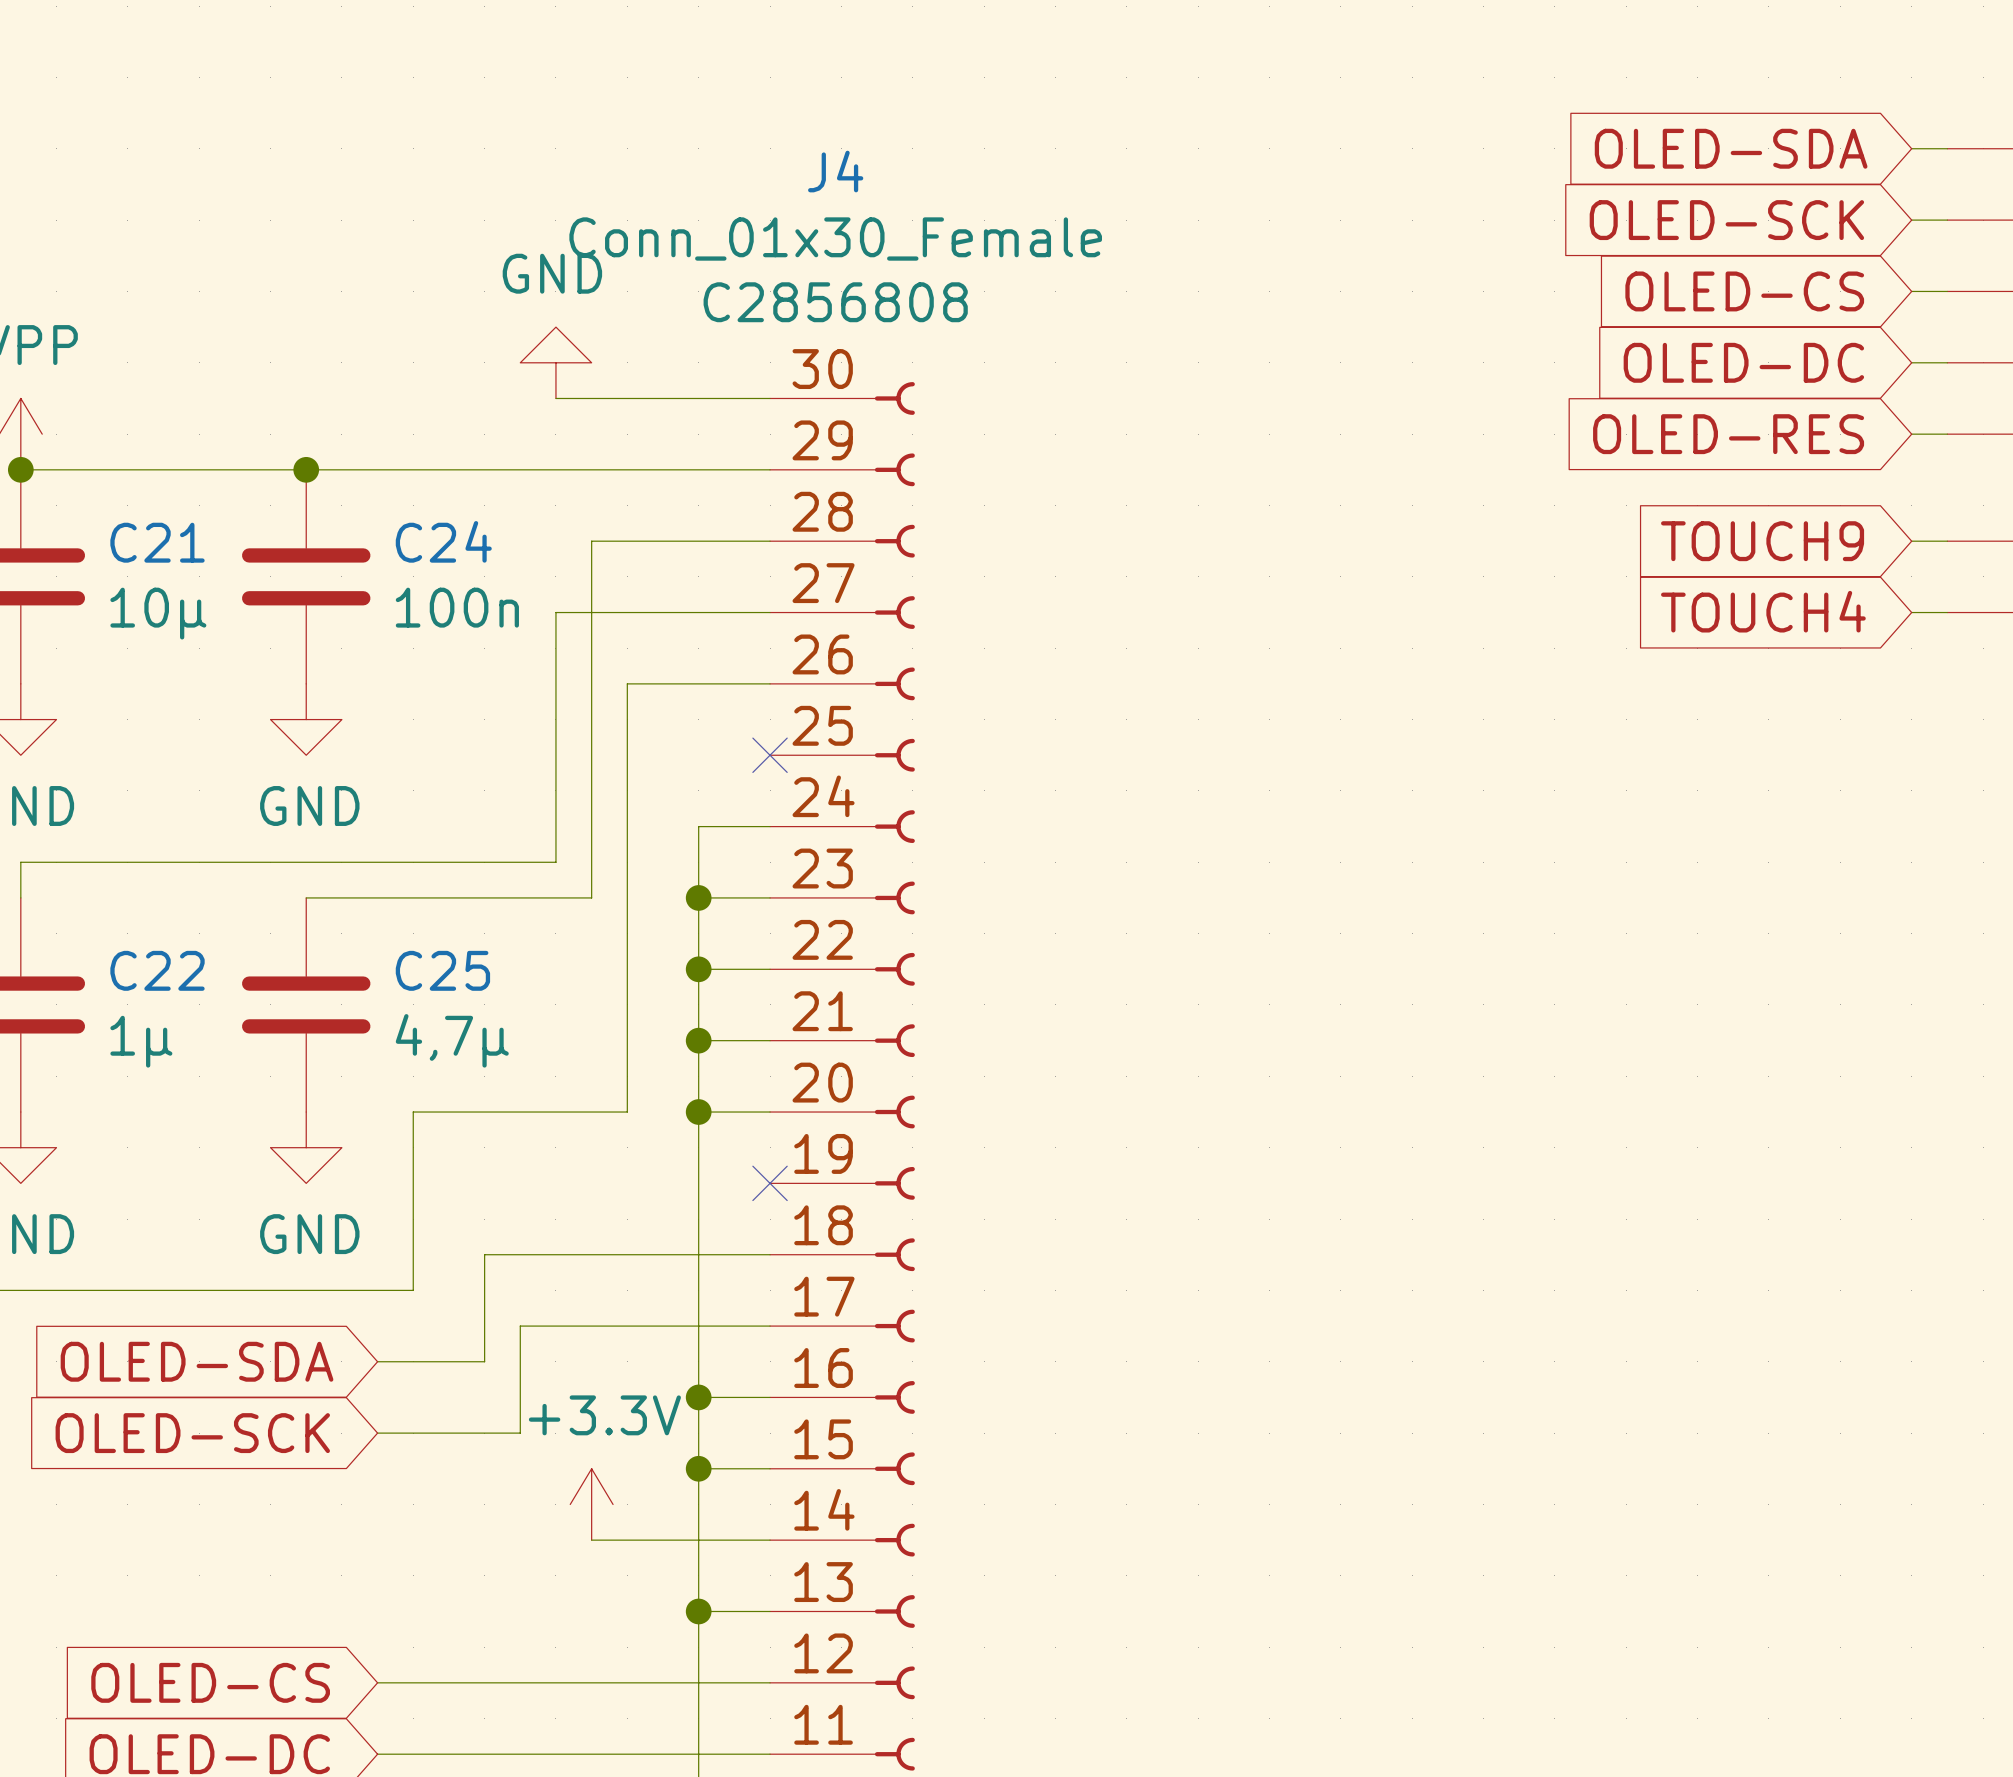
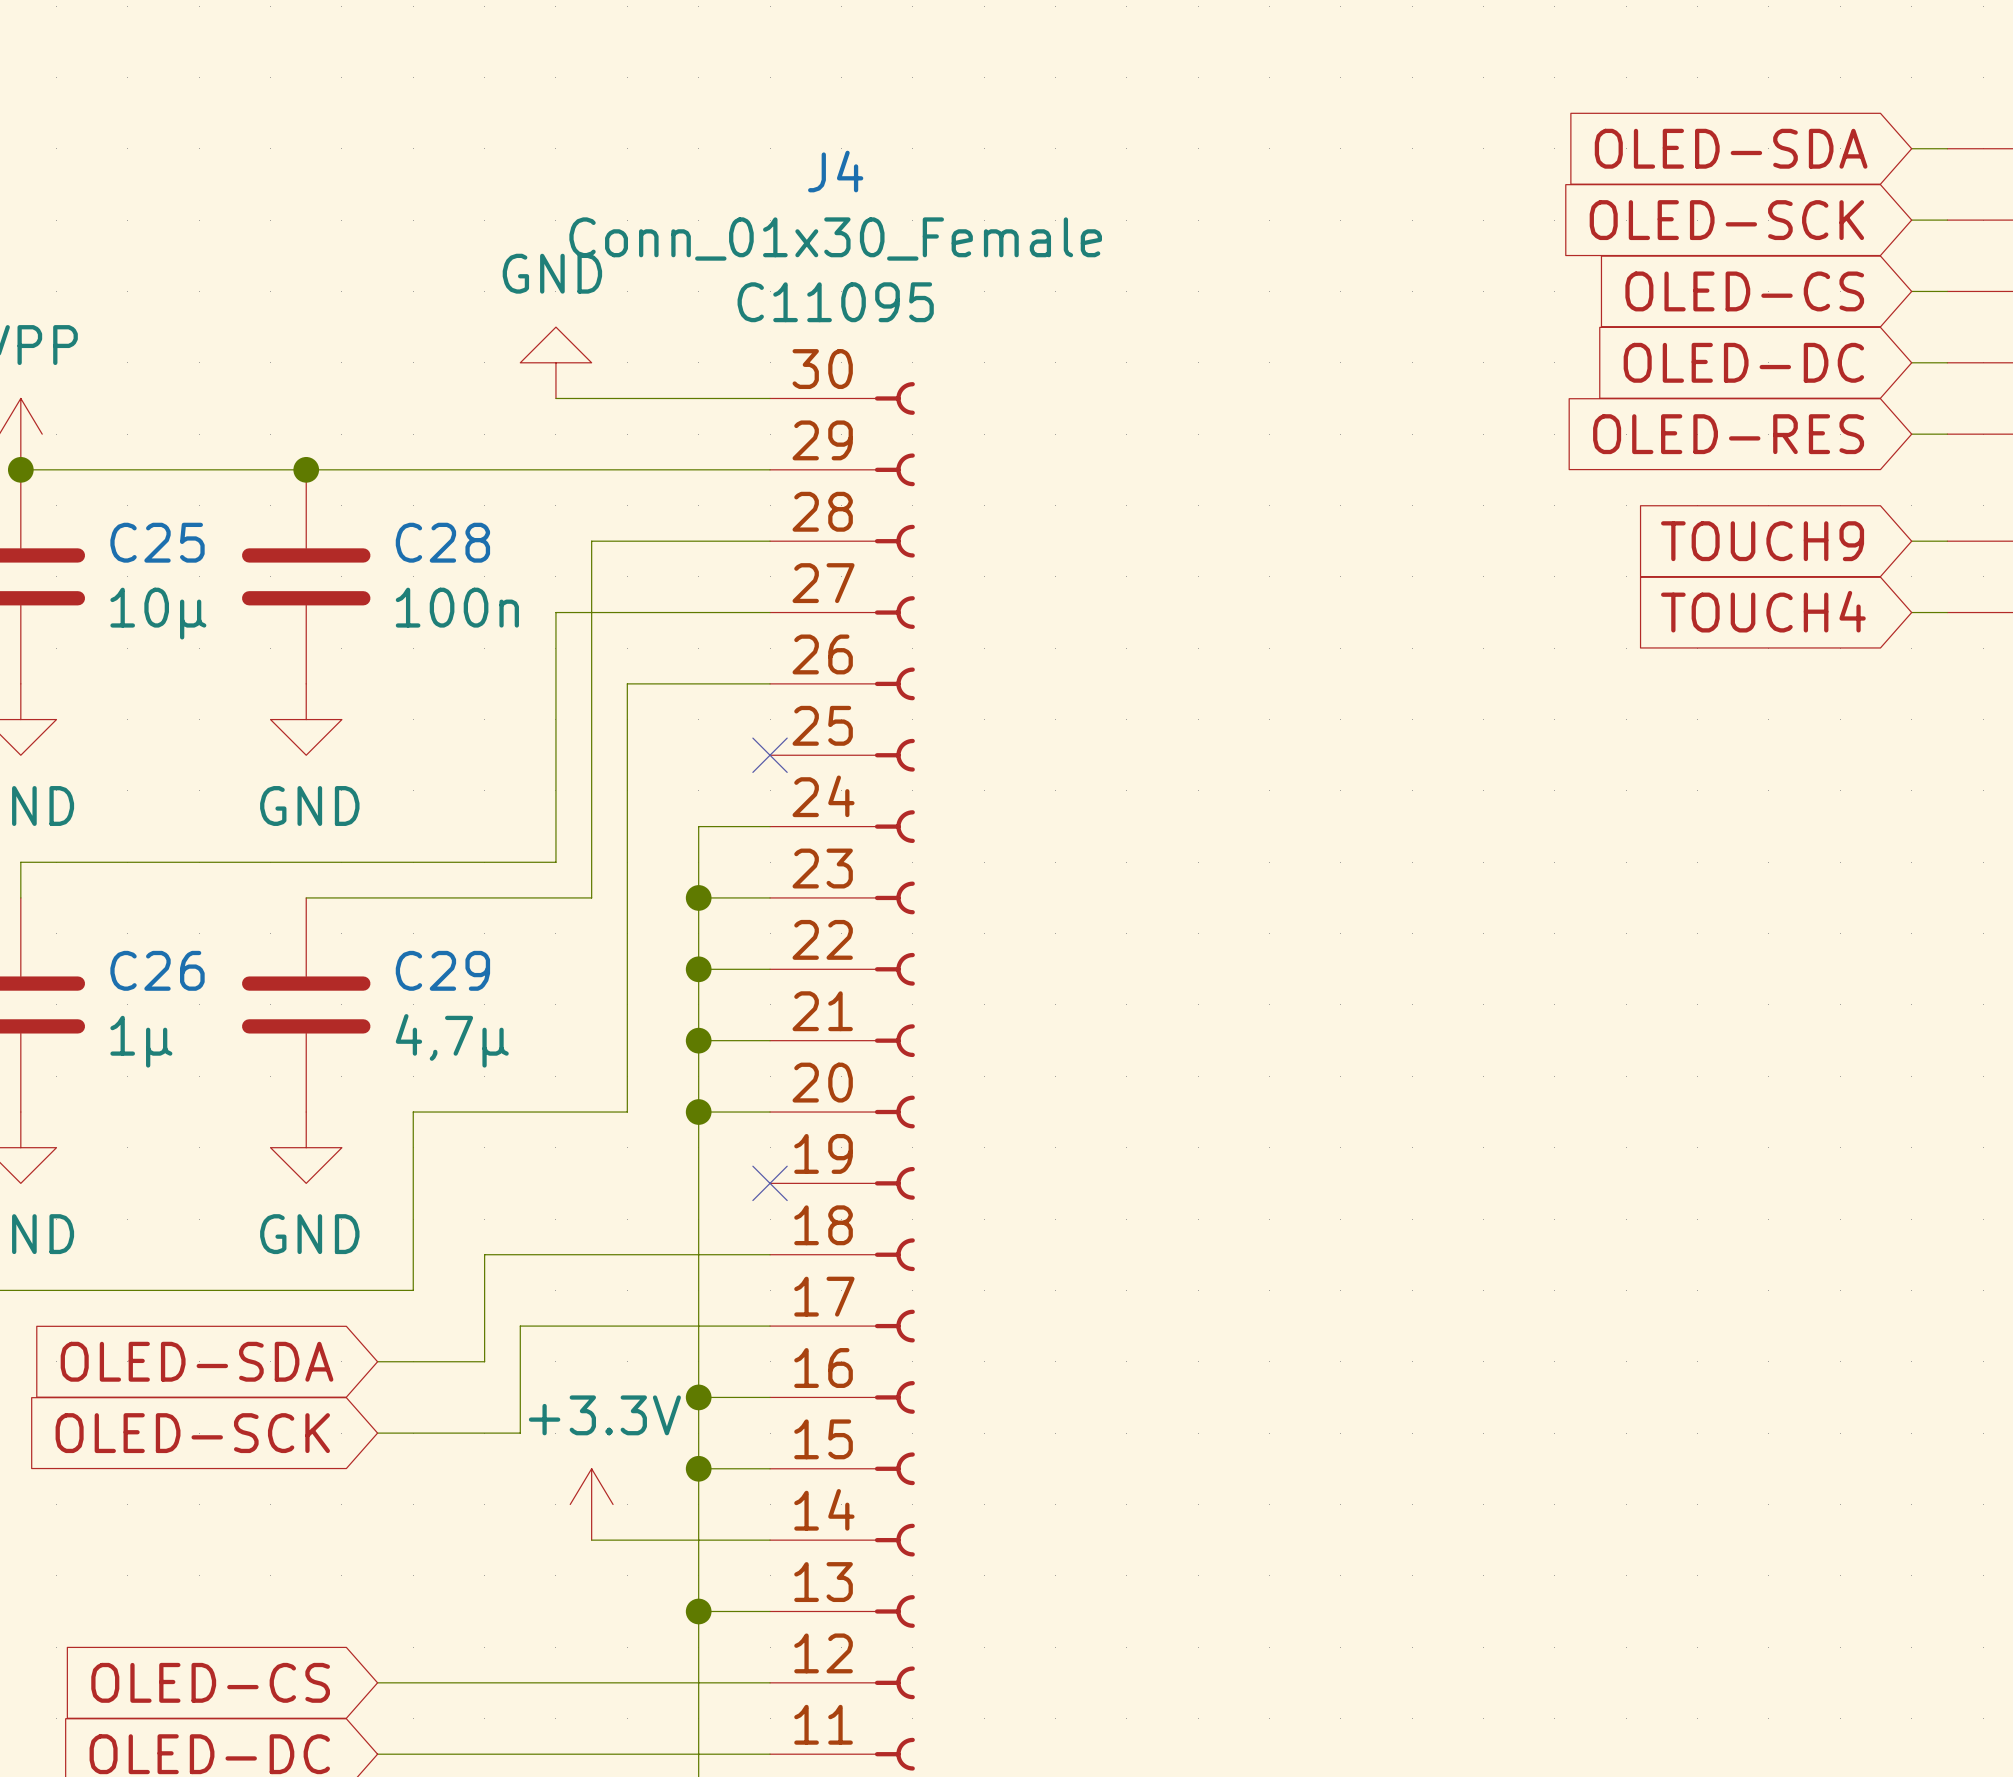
J4 text: C2856808 (835, 302) -> C11095 (835, 302)
C24 name: C24 (443, 541) -> C28 (442, 542)
C21 name: C21 (157, 542) -> C25 (157, 542)
C22 name: C22 (157, 970) -> C26 (157, 970)
C25 name: C25 (442, 970) -> C29 (442, 970)

